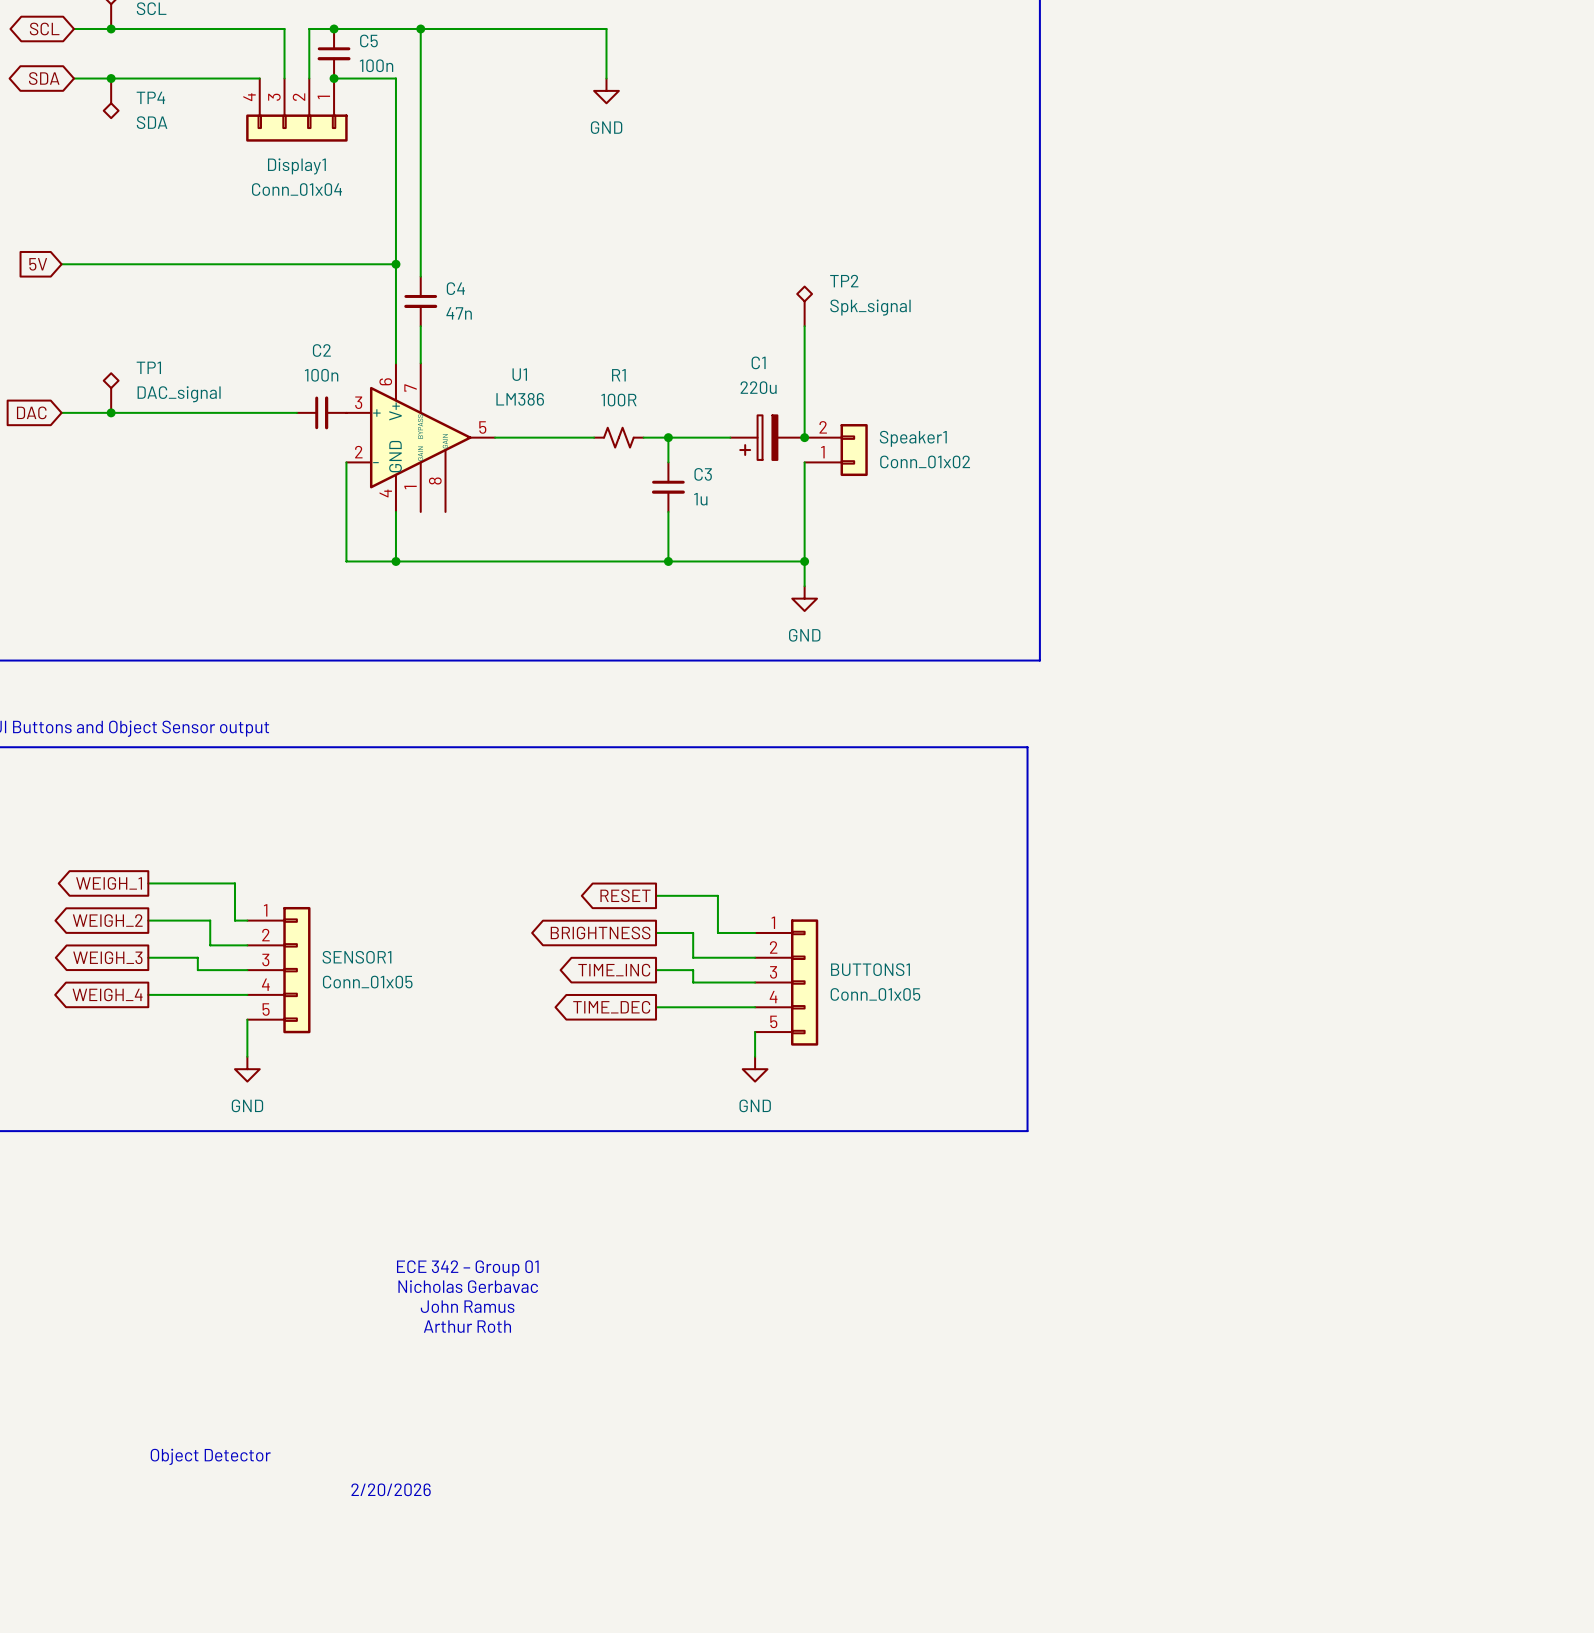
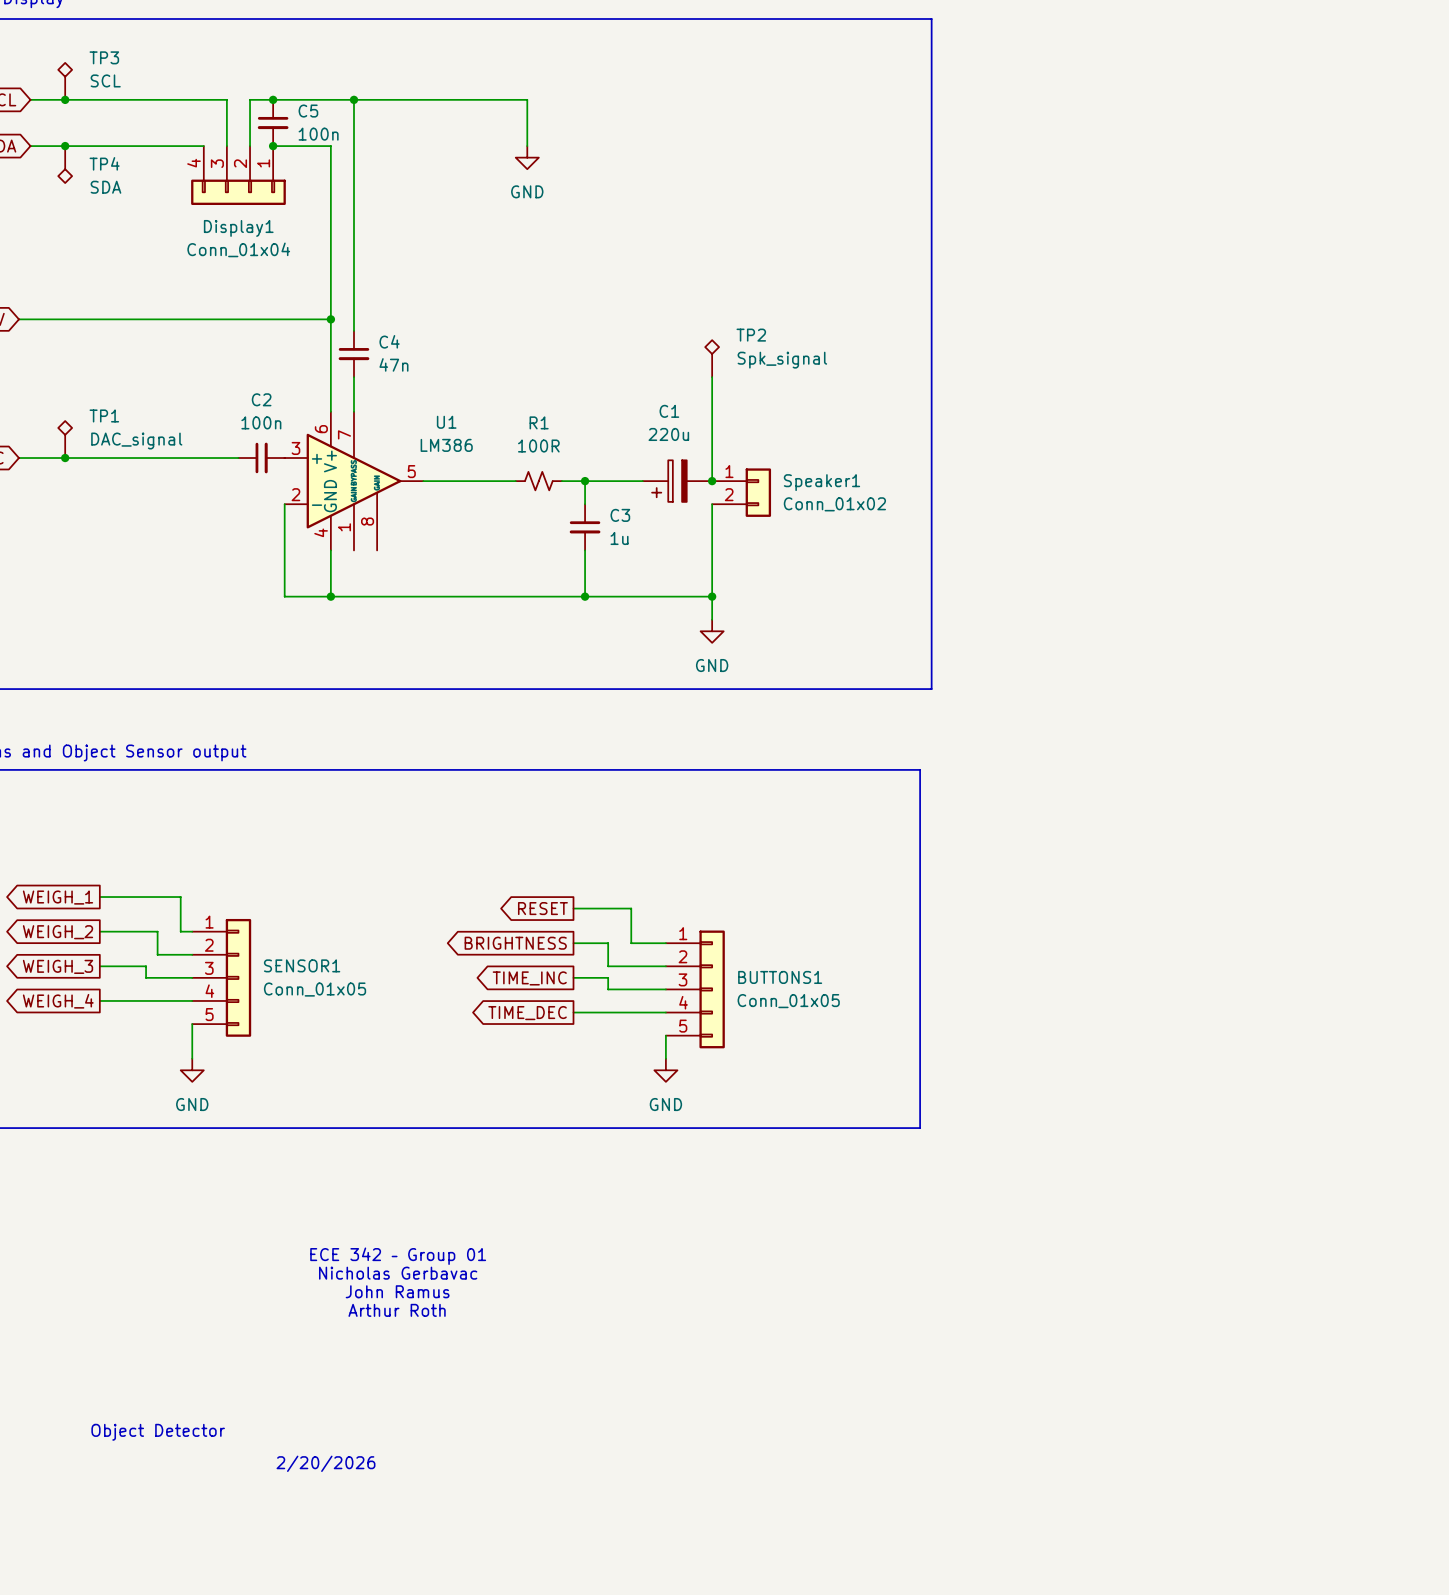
Speaker1 flip: as is (854, 450) -> up-down (758, 492)

